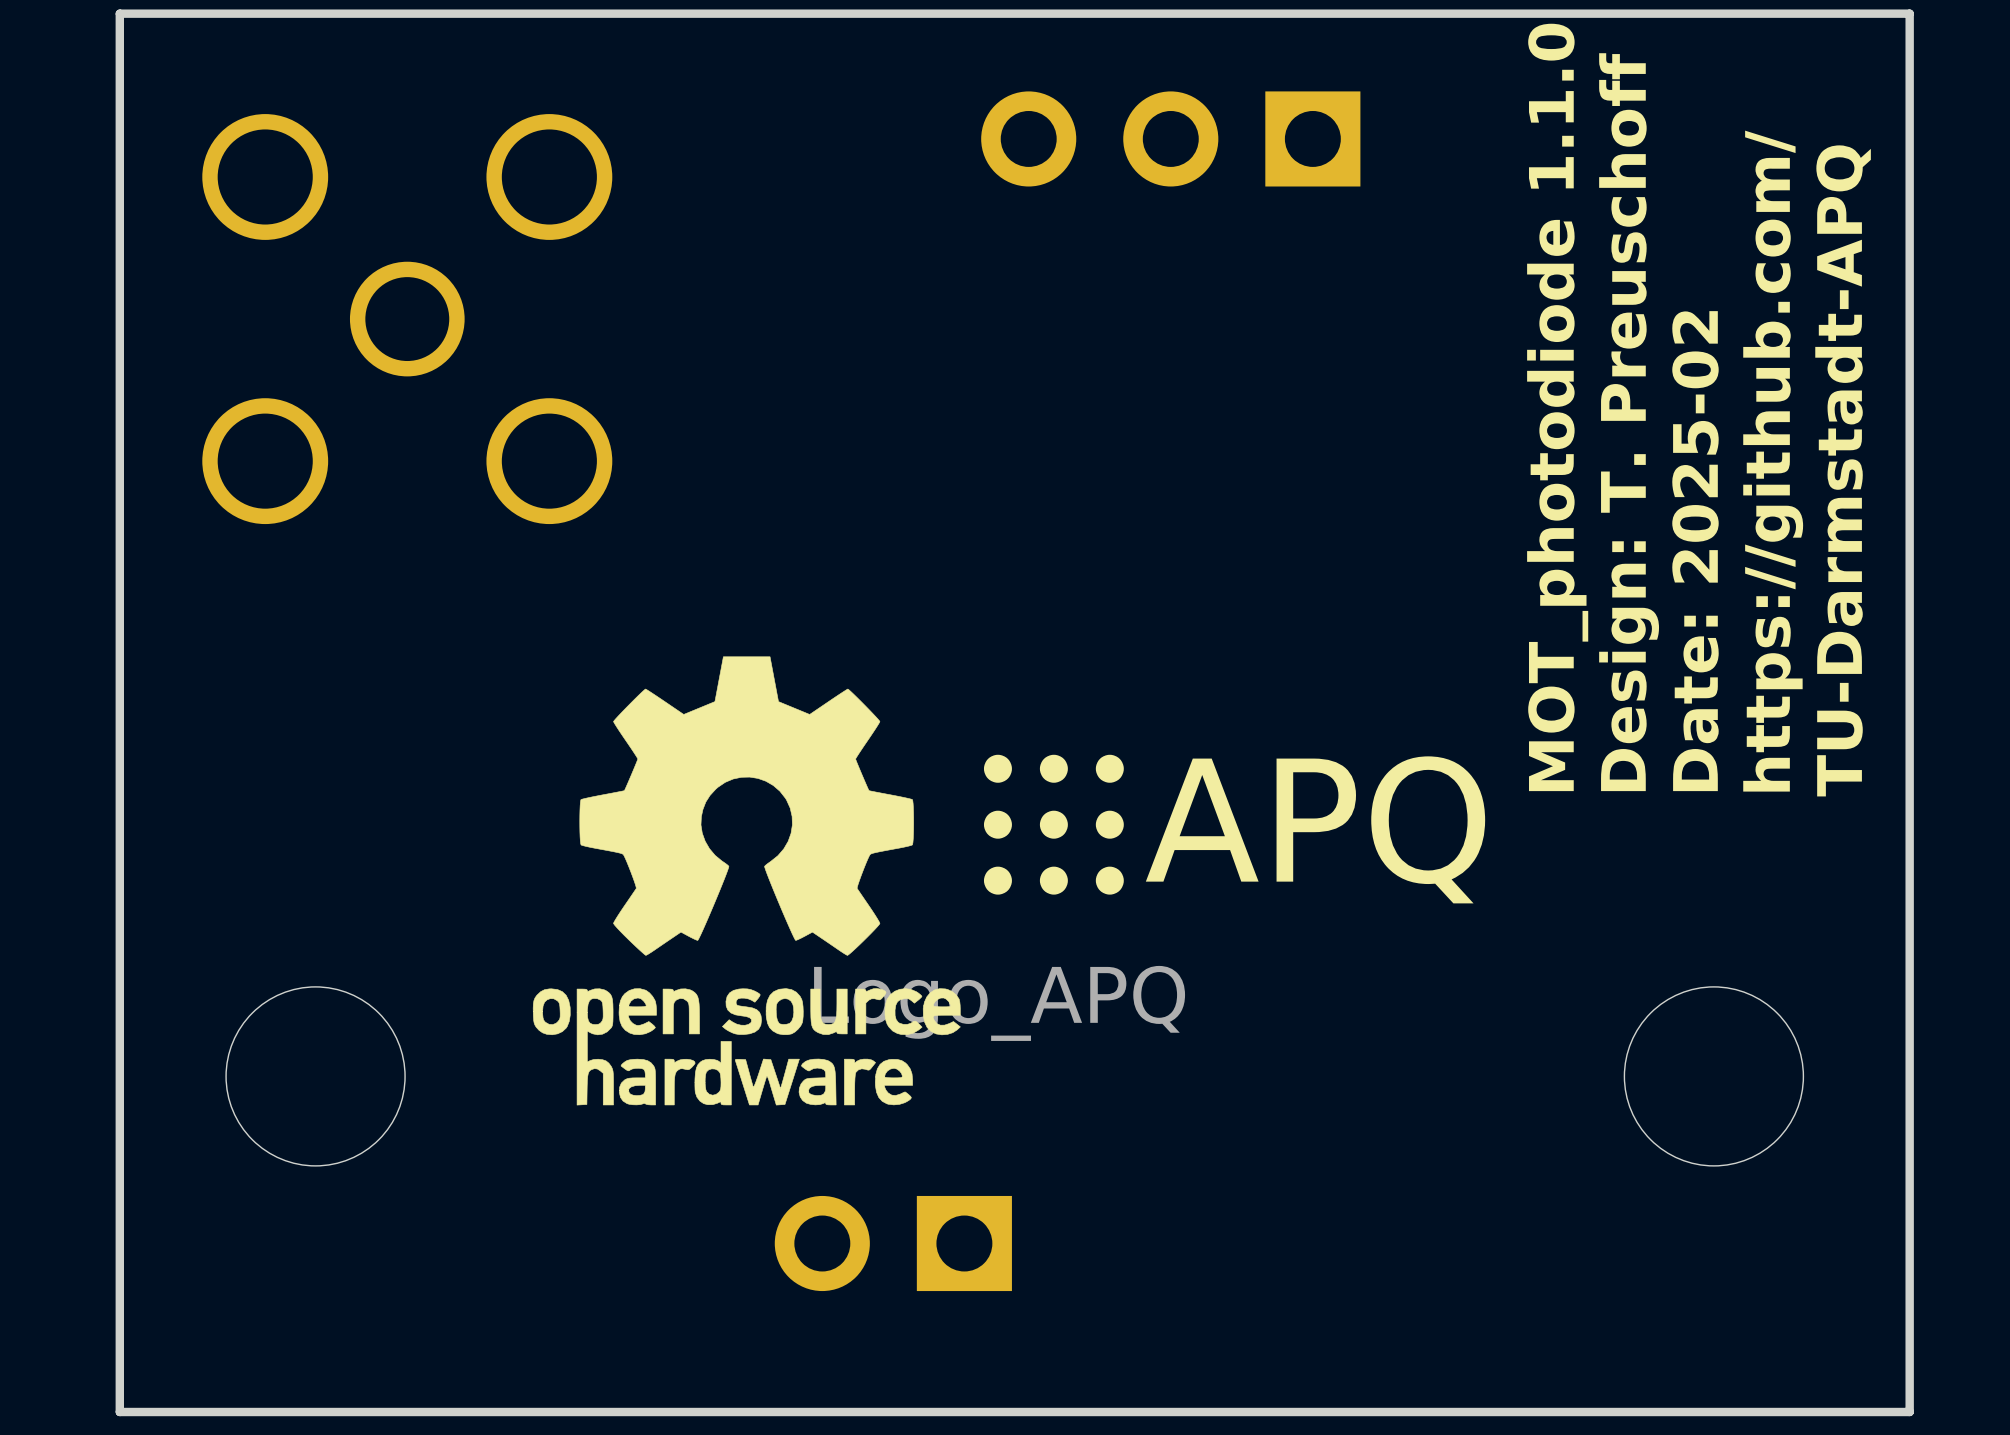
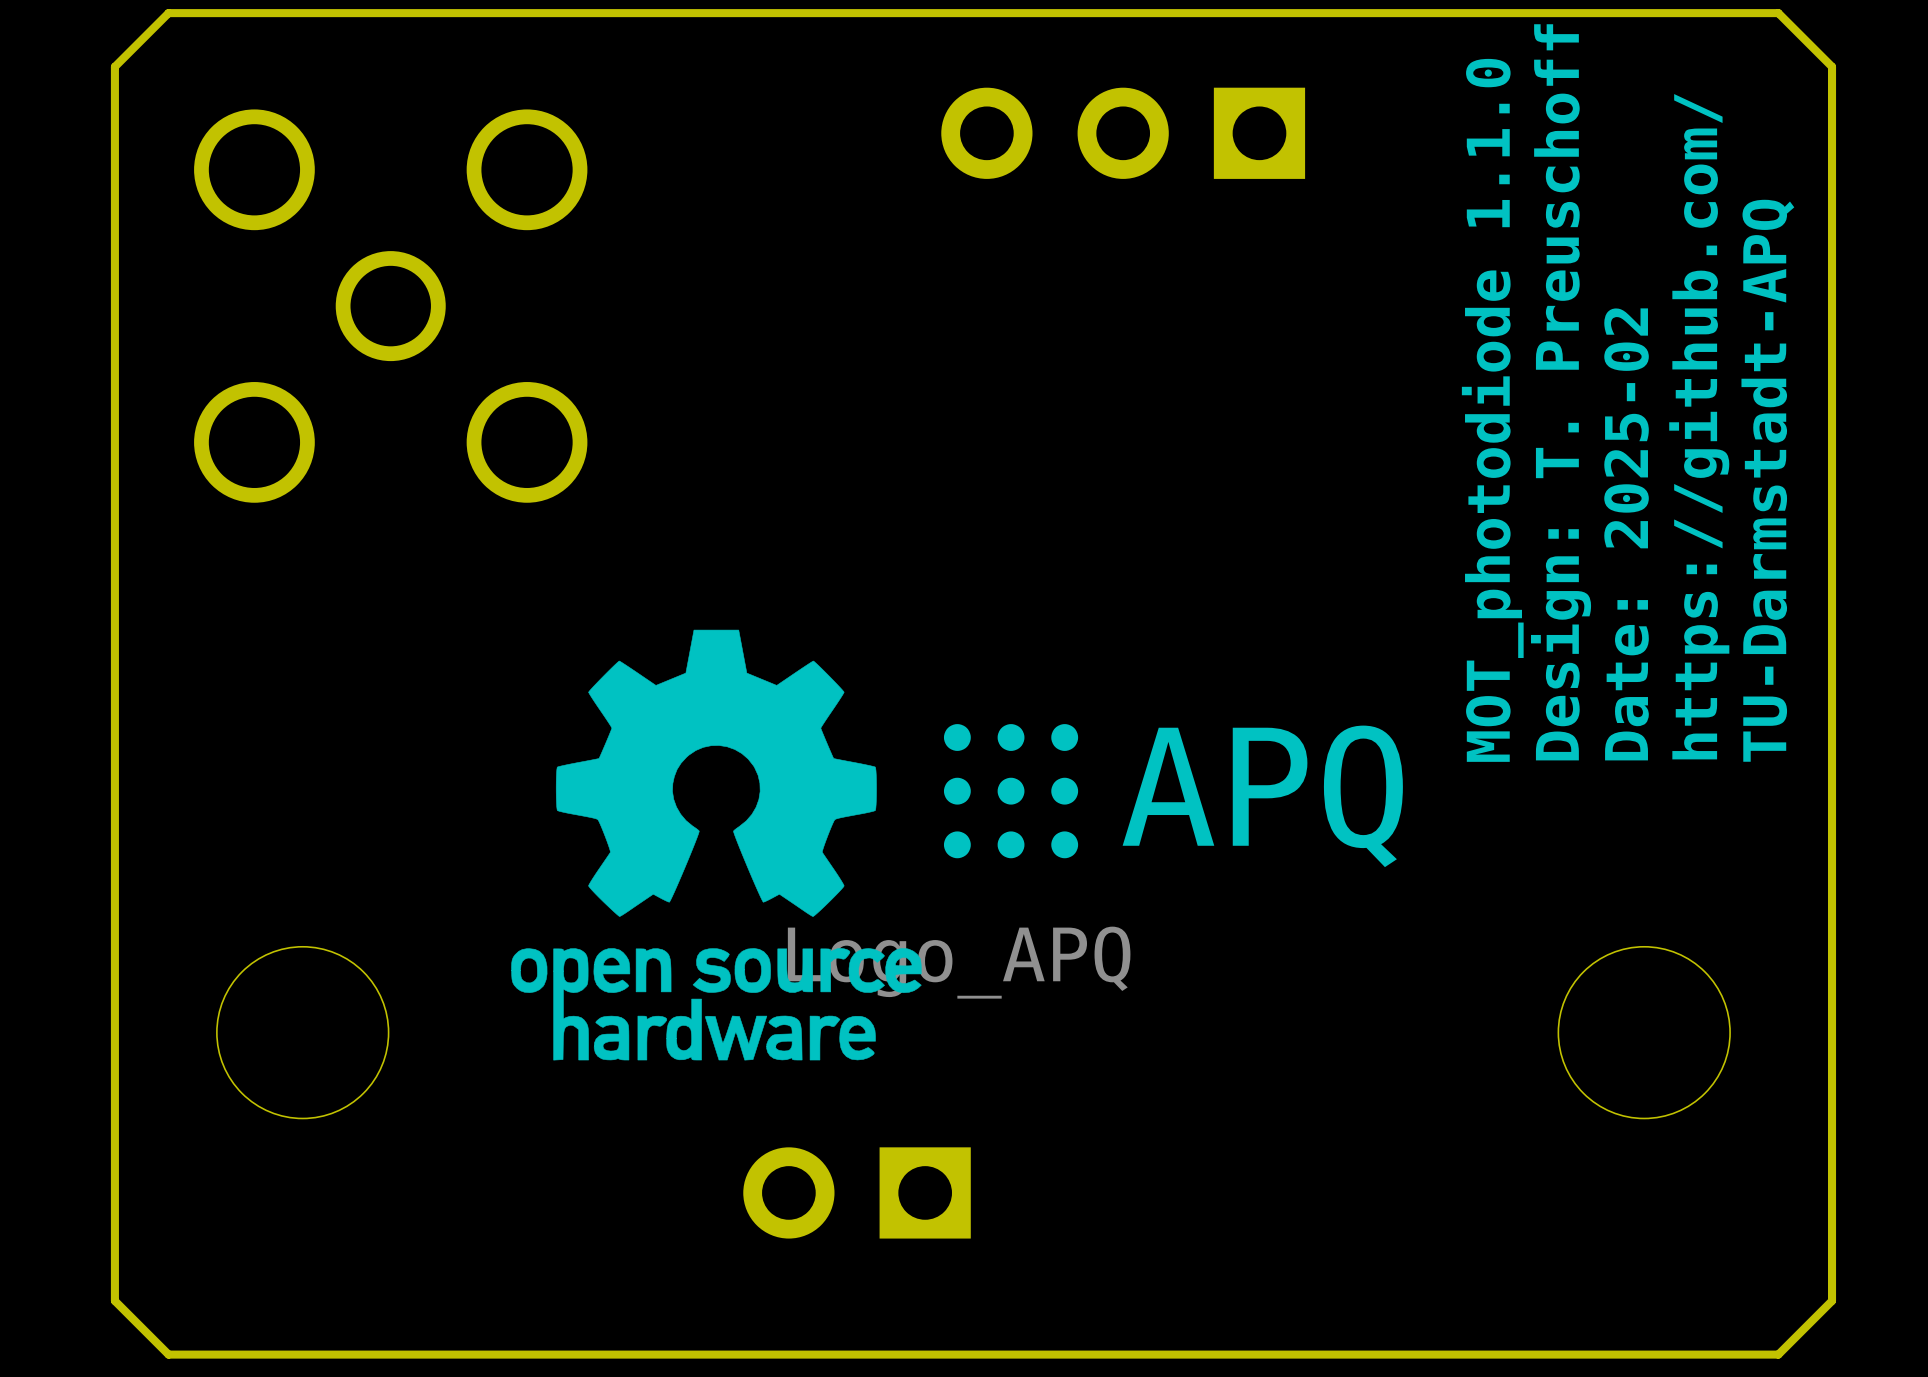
board edge: (175, 13) (119, 13) (119, 69) -> (168, 13) (114, 66)
board edge: (1853, 13) (1909, 13) (1909, 69) -> (1778, 13) (1832, 66)
board edge: (119, 1356) (119, 1412) (175, 1412) -> (114, 1300) (168, 1354)
board edge: (1909, 1356) (1909, 1412) (1853, 1412) -> (1832, 1300) (1778, 1354)

